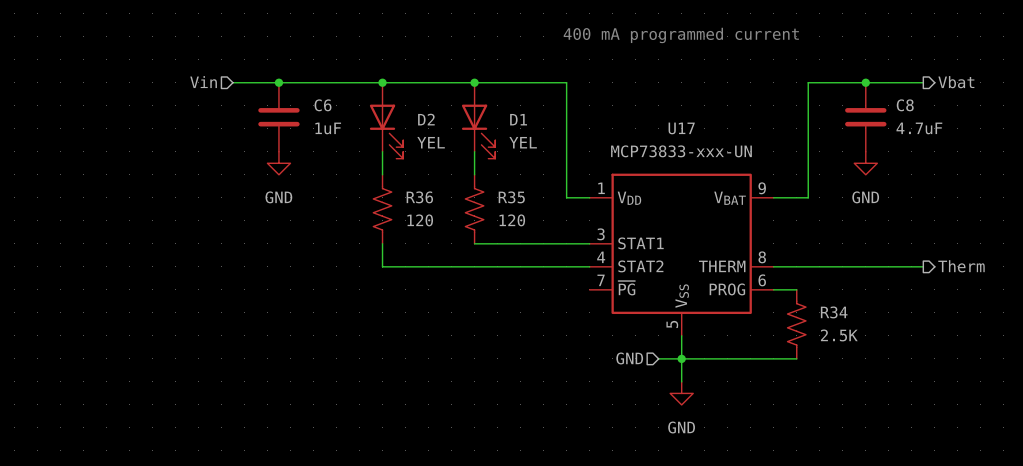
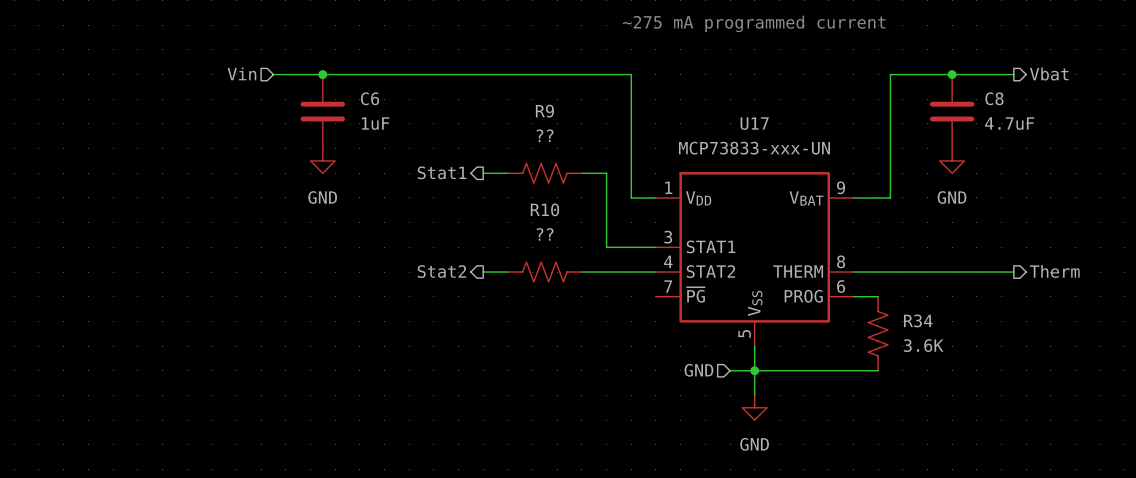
text: 400 mA programmed current (681, 35) -> ~275 mA programmed current (754, 23)
junction: (382, 82) -> none
junction: (474, 82) -> none
D2: YEL (386, 120) -> none
D1: YEL (478, 120) -> none
wire: (382, 151) (382, 174) -> none
wire: (474, 151) (474, 174) -> none
hierarchical label: none -> Stat1 (442, 172)
wire: none -> (483, 173) (507, 173)
R9: none -> ?? (544, 173)
R36: 120 (382, 209) -> none
R35: 120 (474, 209) -> none
wire: (382, 243) (382, 266) (428, 266) -> none
wire: (474, 243) (543, 243) -> (581, 173) (606, 173) (606, 247)
hierarchical label: none -> Stat2 (441, 271)
R10: none -> ?? (544, 272)
R34 value: 2.5K (839, 335) -> 3.6K (923, 345)

